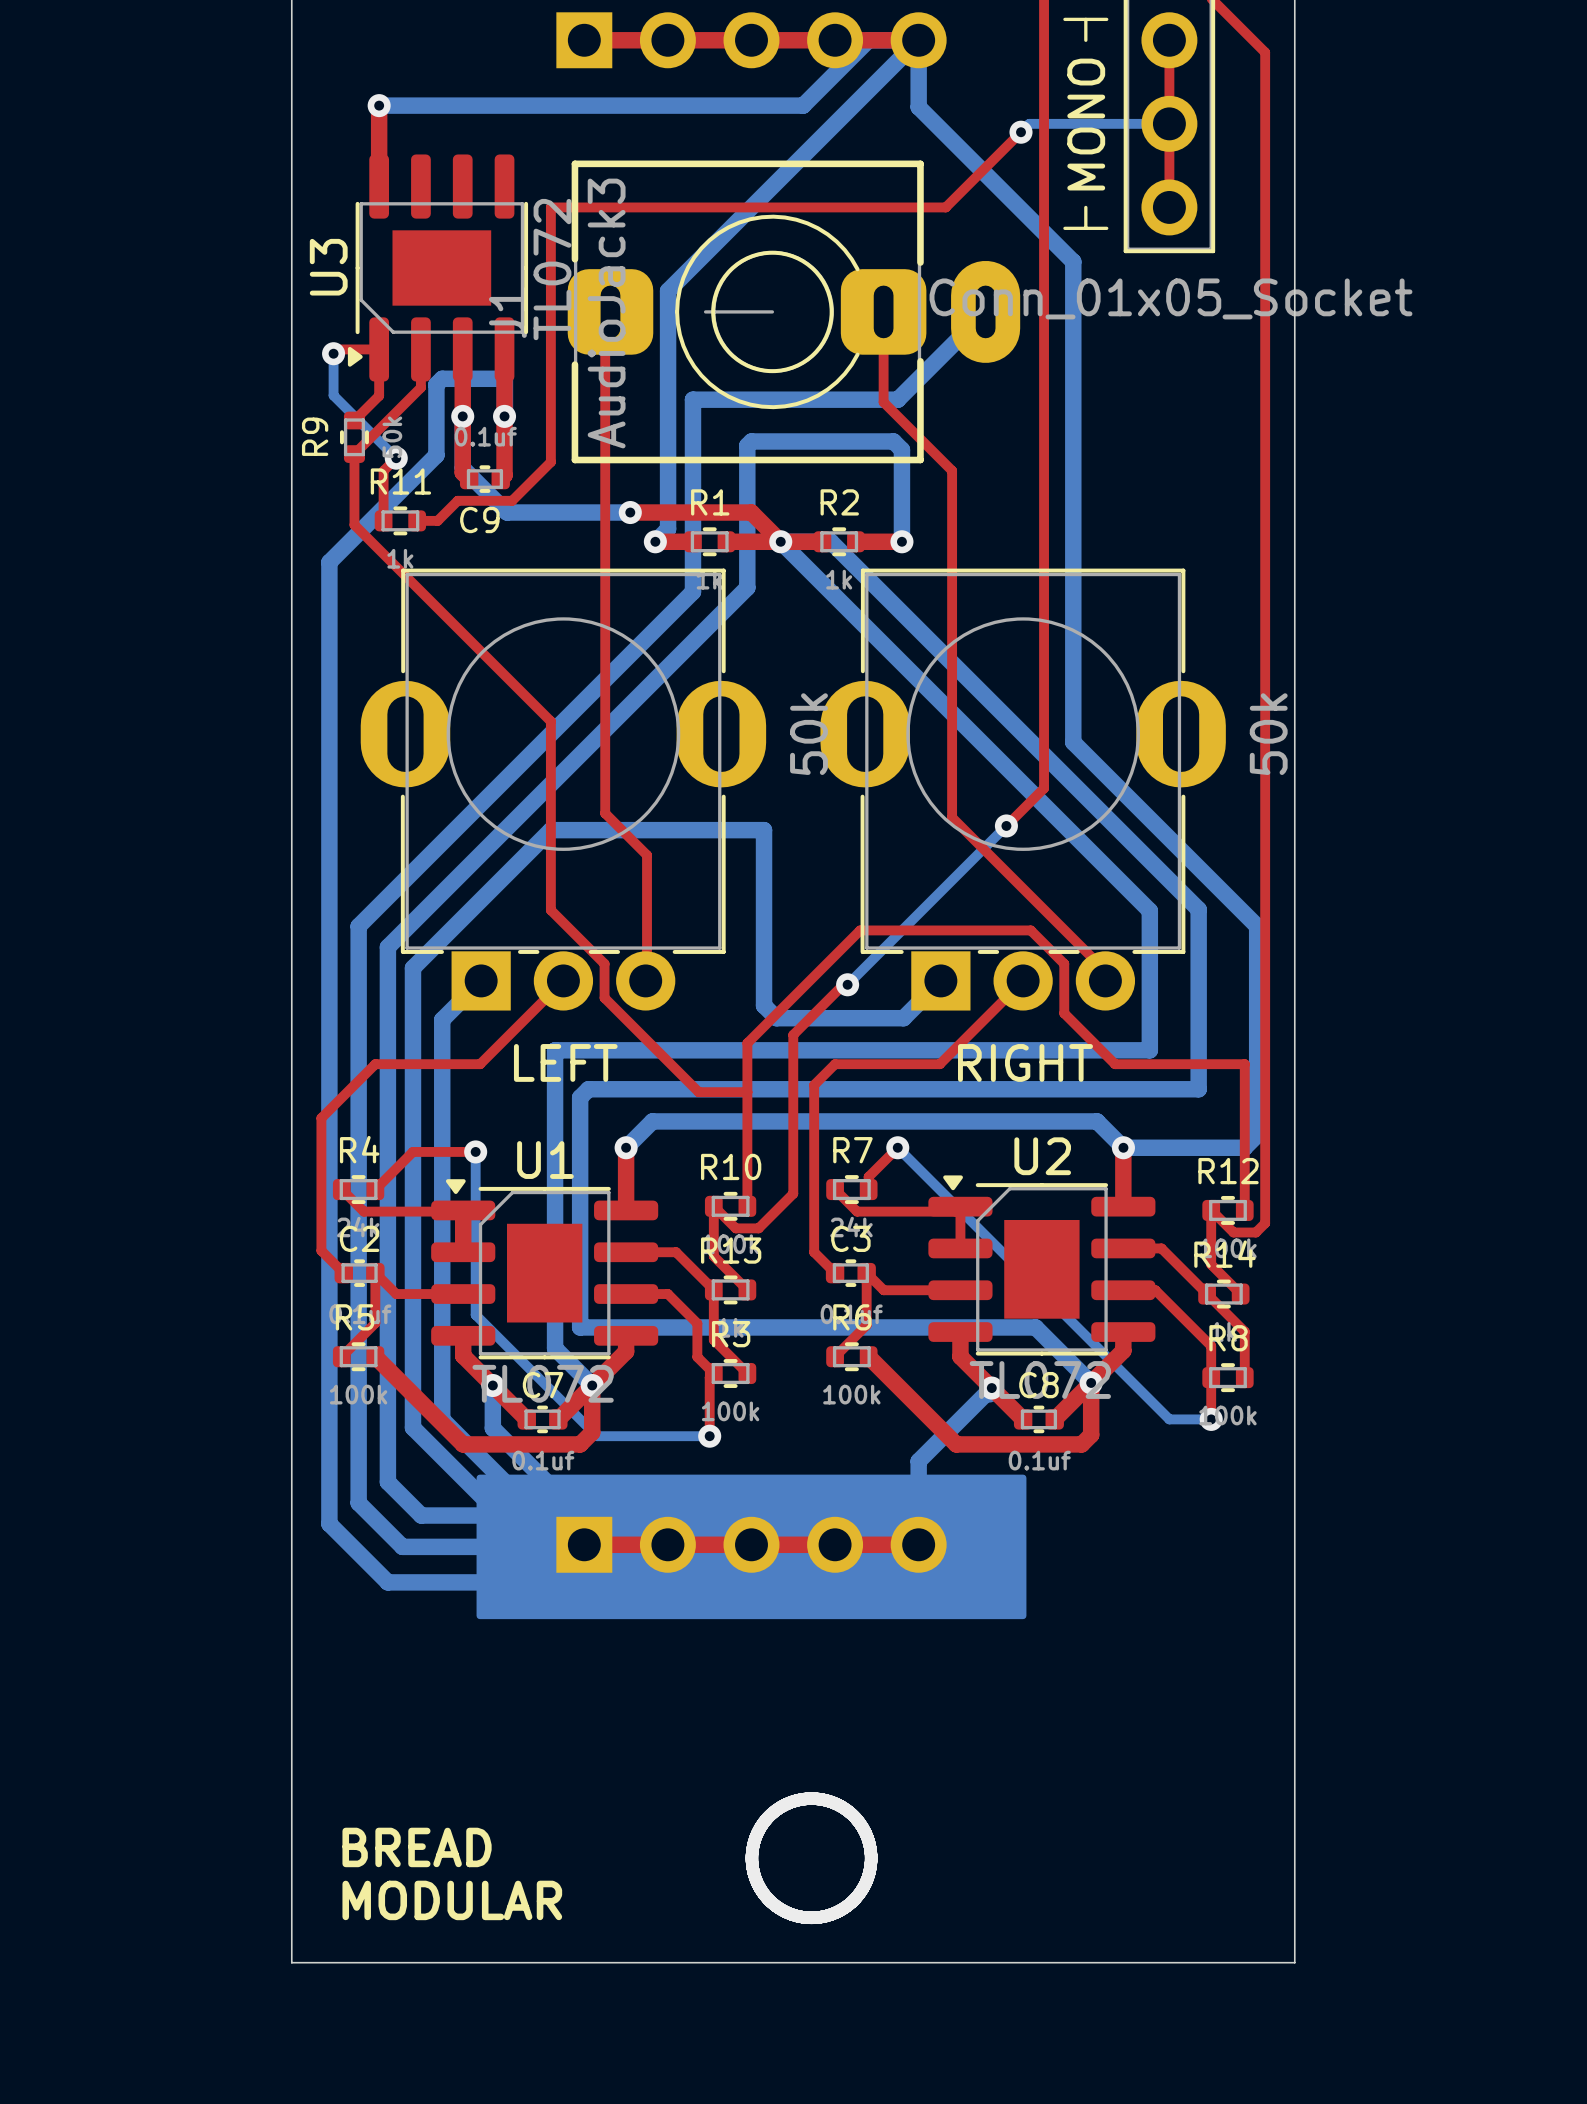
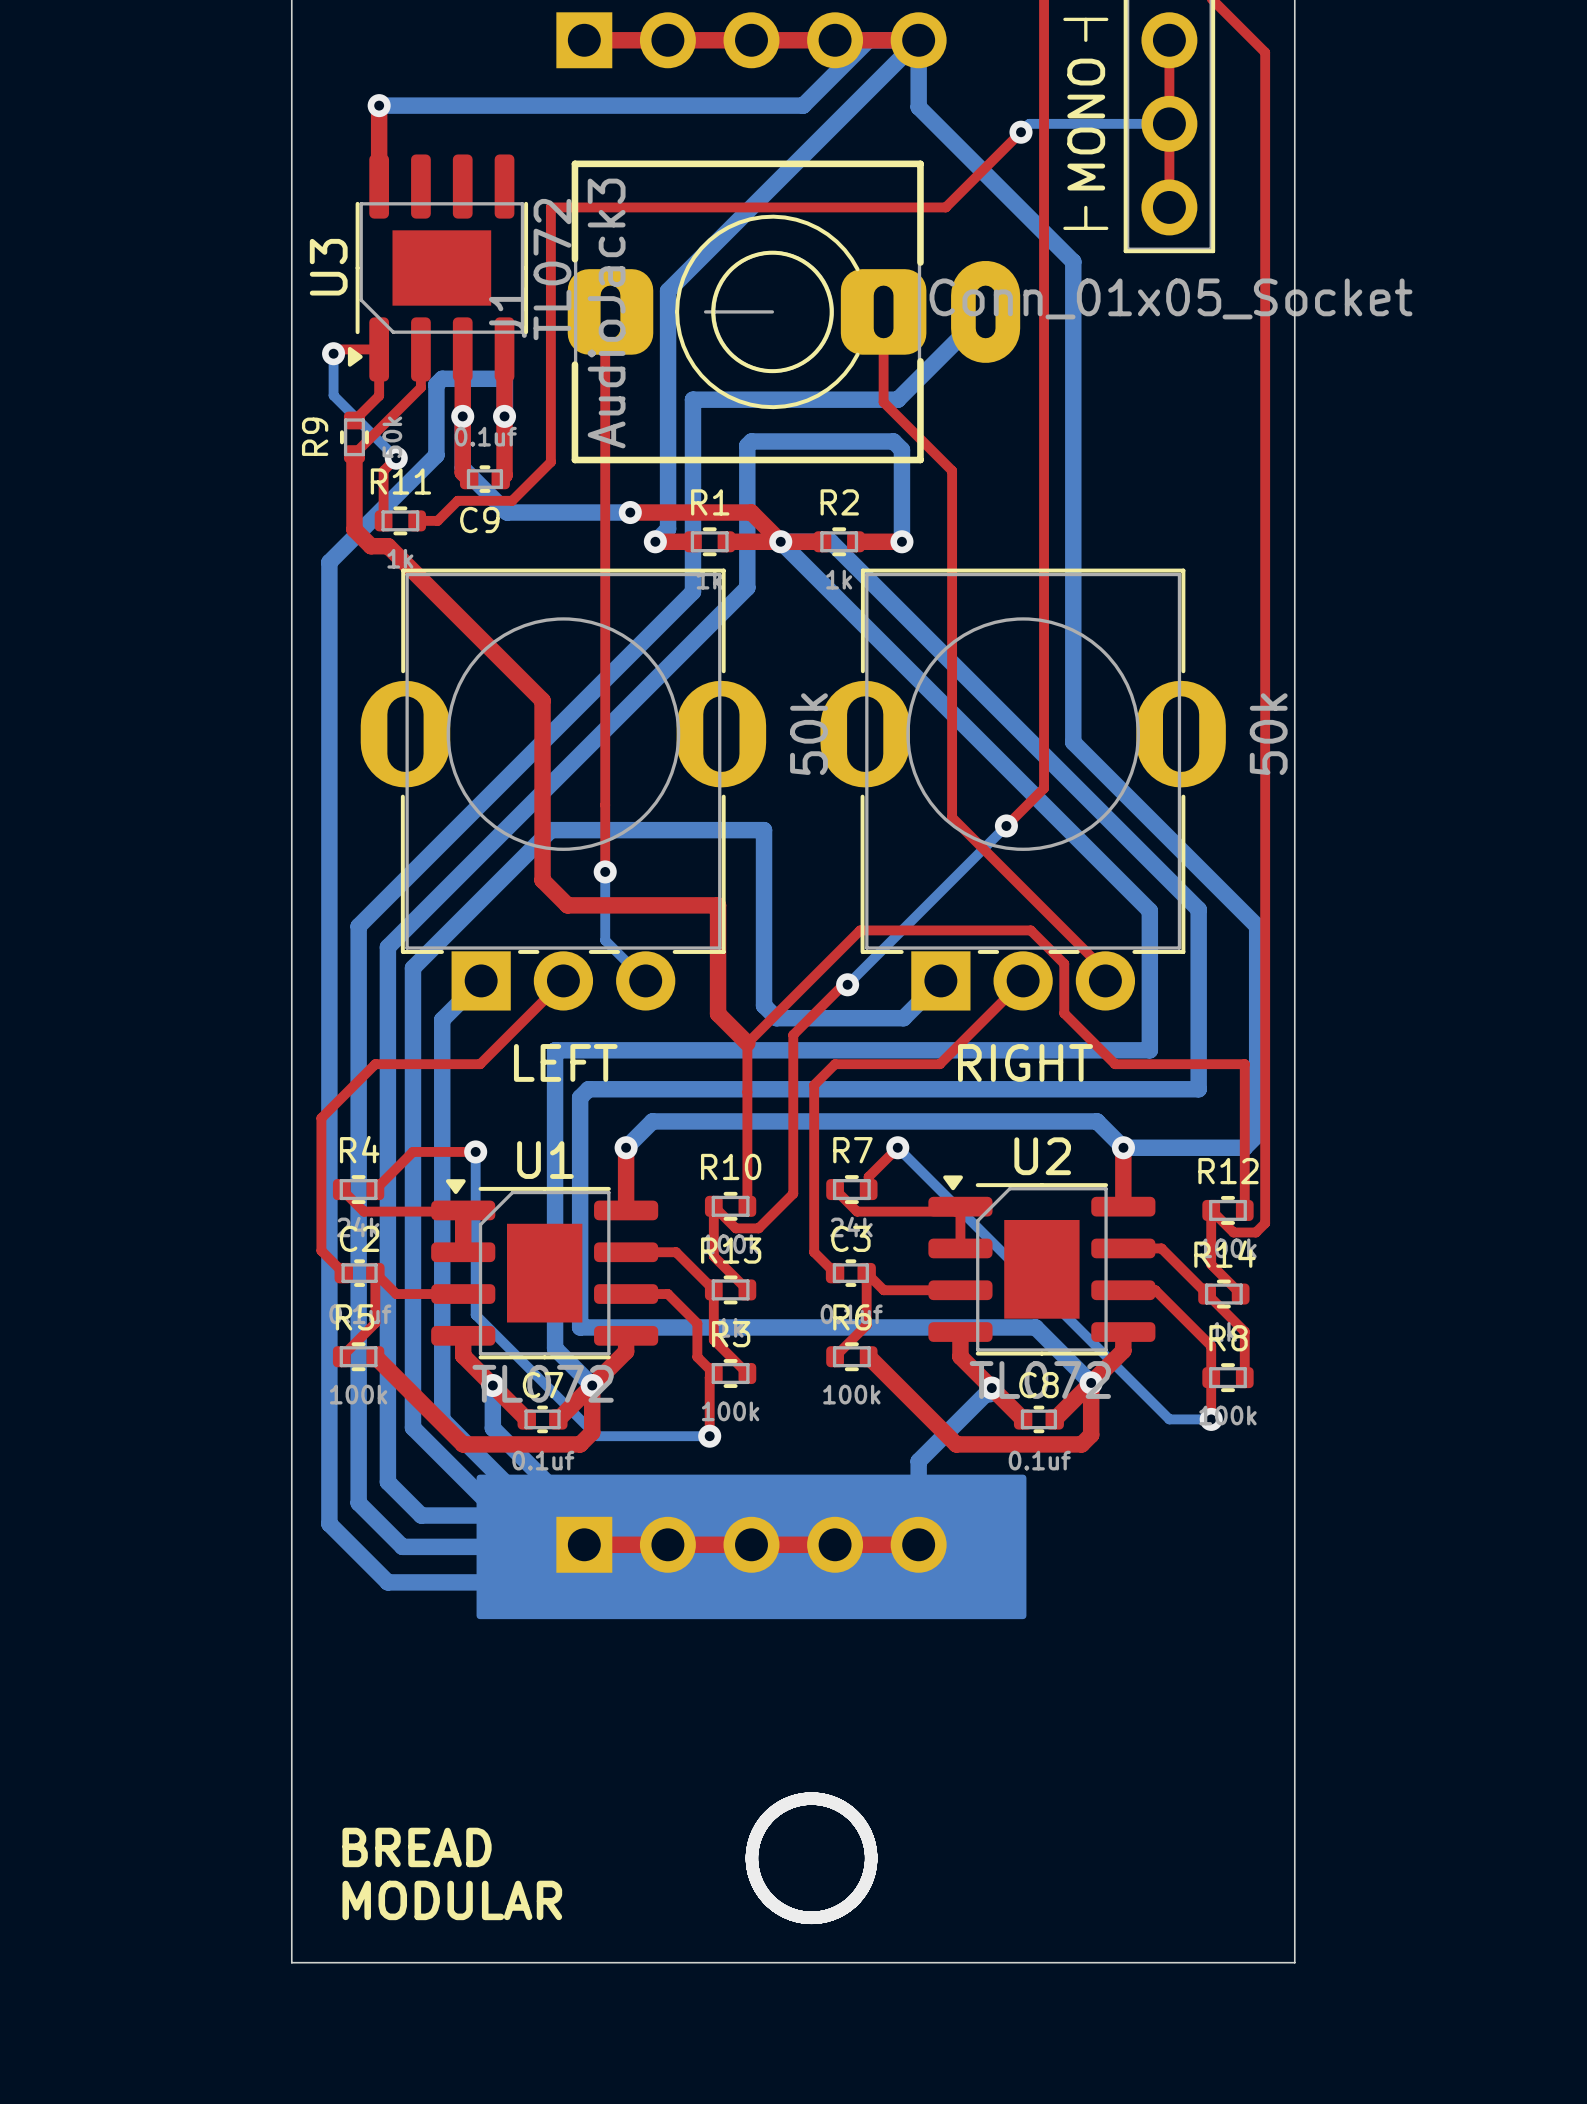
top track width: thin (354, 454) (354, 524) -> thick (354, 454) (354, 524)
top track: (354, 524) (550, 721) (550, 910) (604, 963) (604, 997) (698, 1092) (747, 1092) -> (354, 524) (354, 529) (371, 546) (388, 546) (542, 700) (542, 880) (567, 905) (718, 905) (718, 1013) (747, 1043)
top track: (605, 813) (647, 855) (647, 979) -> (605, 813) (605, 871)
bottom track: none -> (605, 871) (605, 940) (645, 980)
via: none -> (605, 871)

